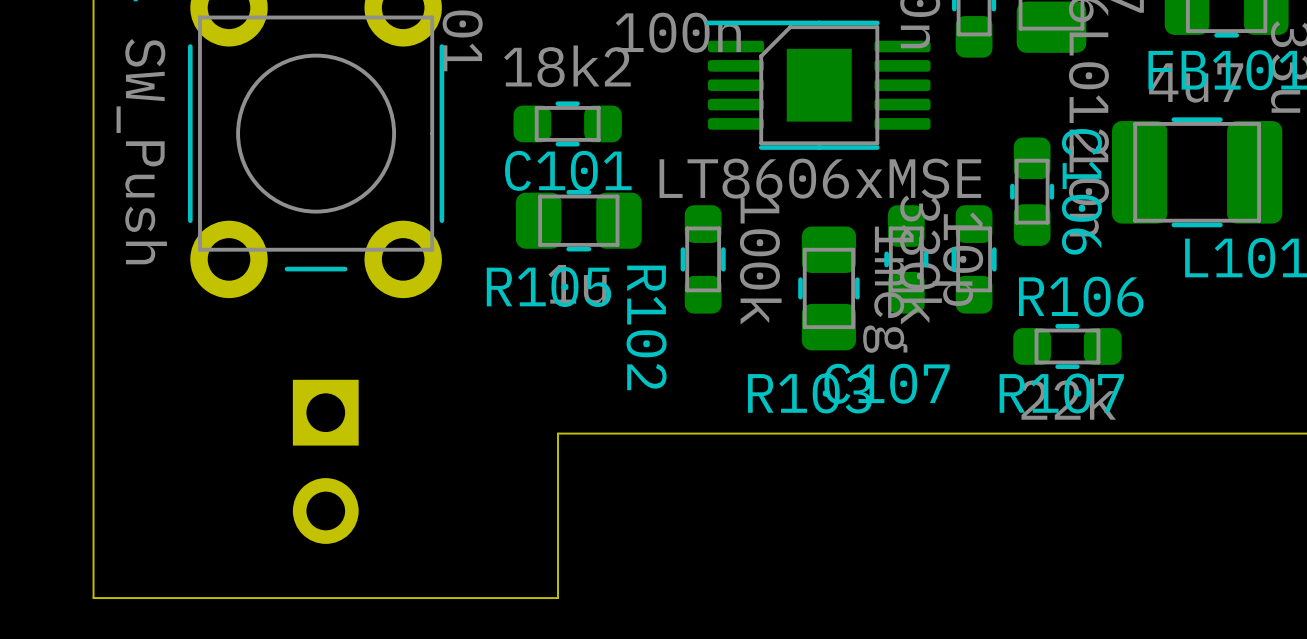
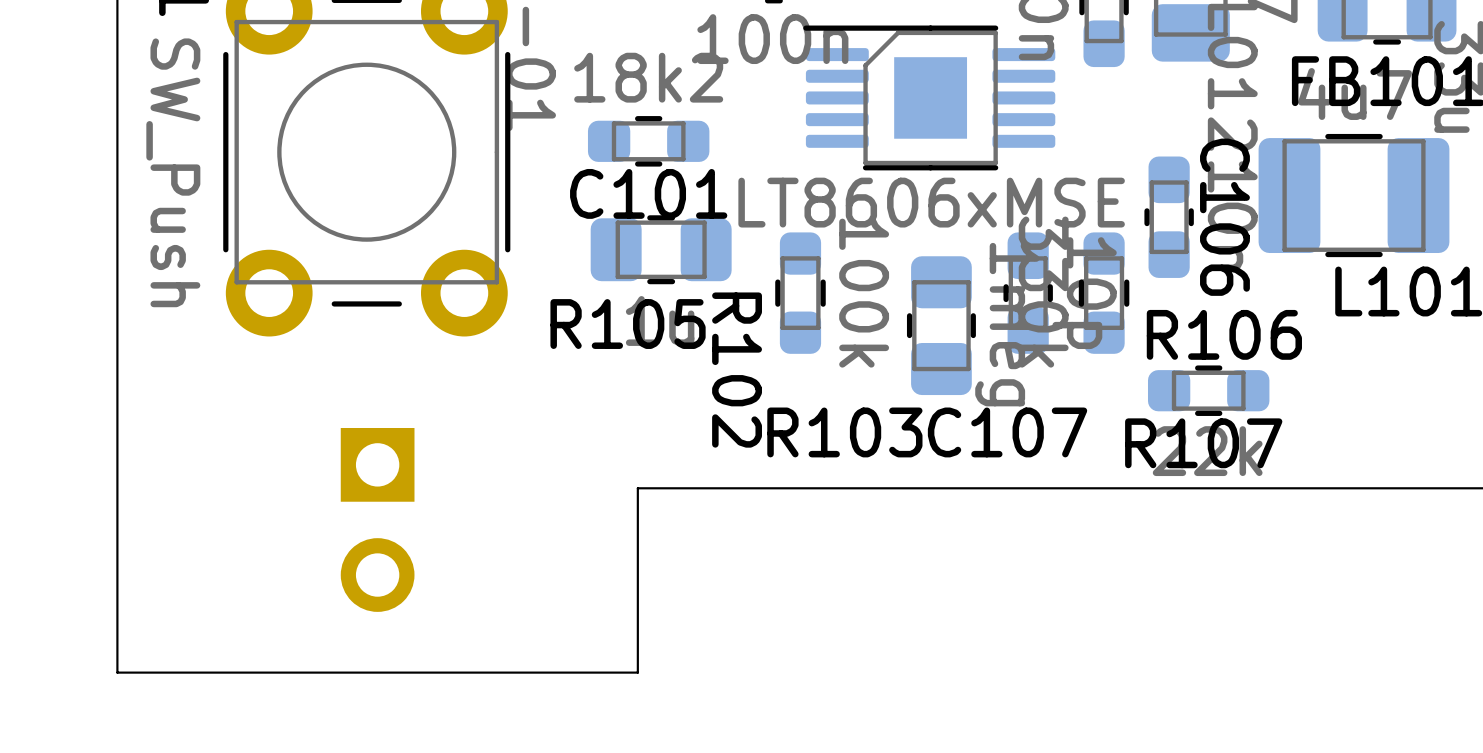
R103 name position: R103 (809, 393) -> R103 (844, 432)

